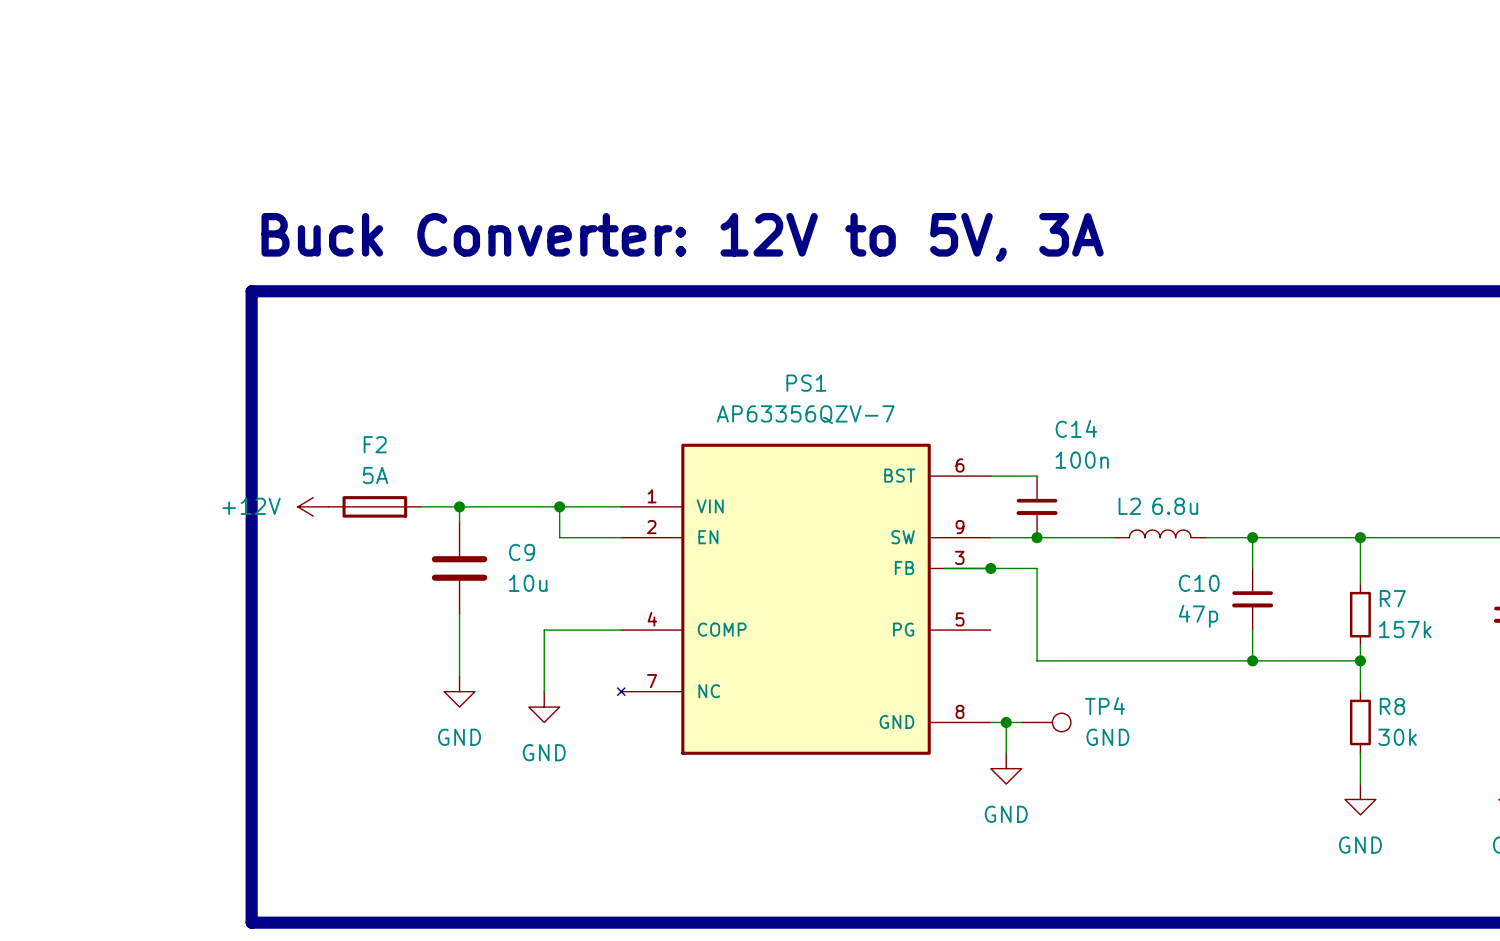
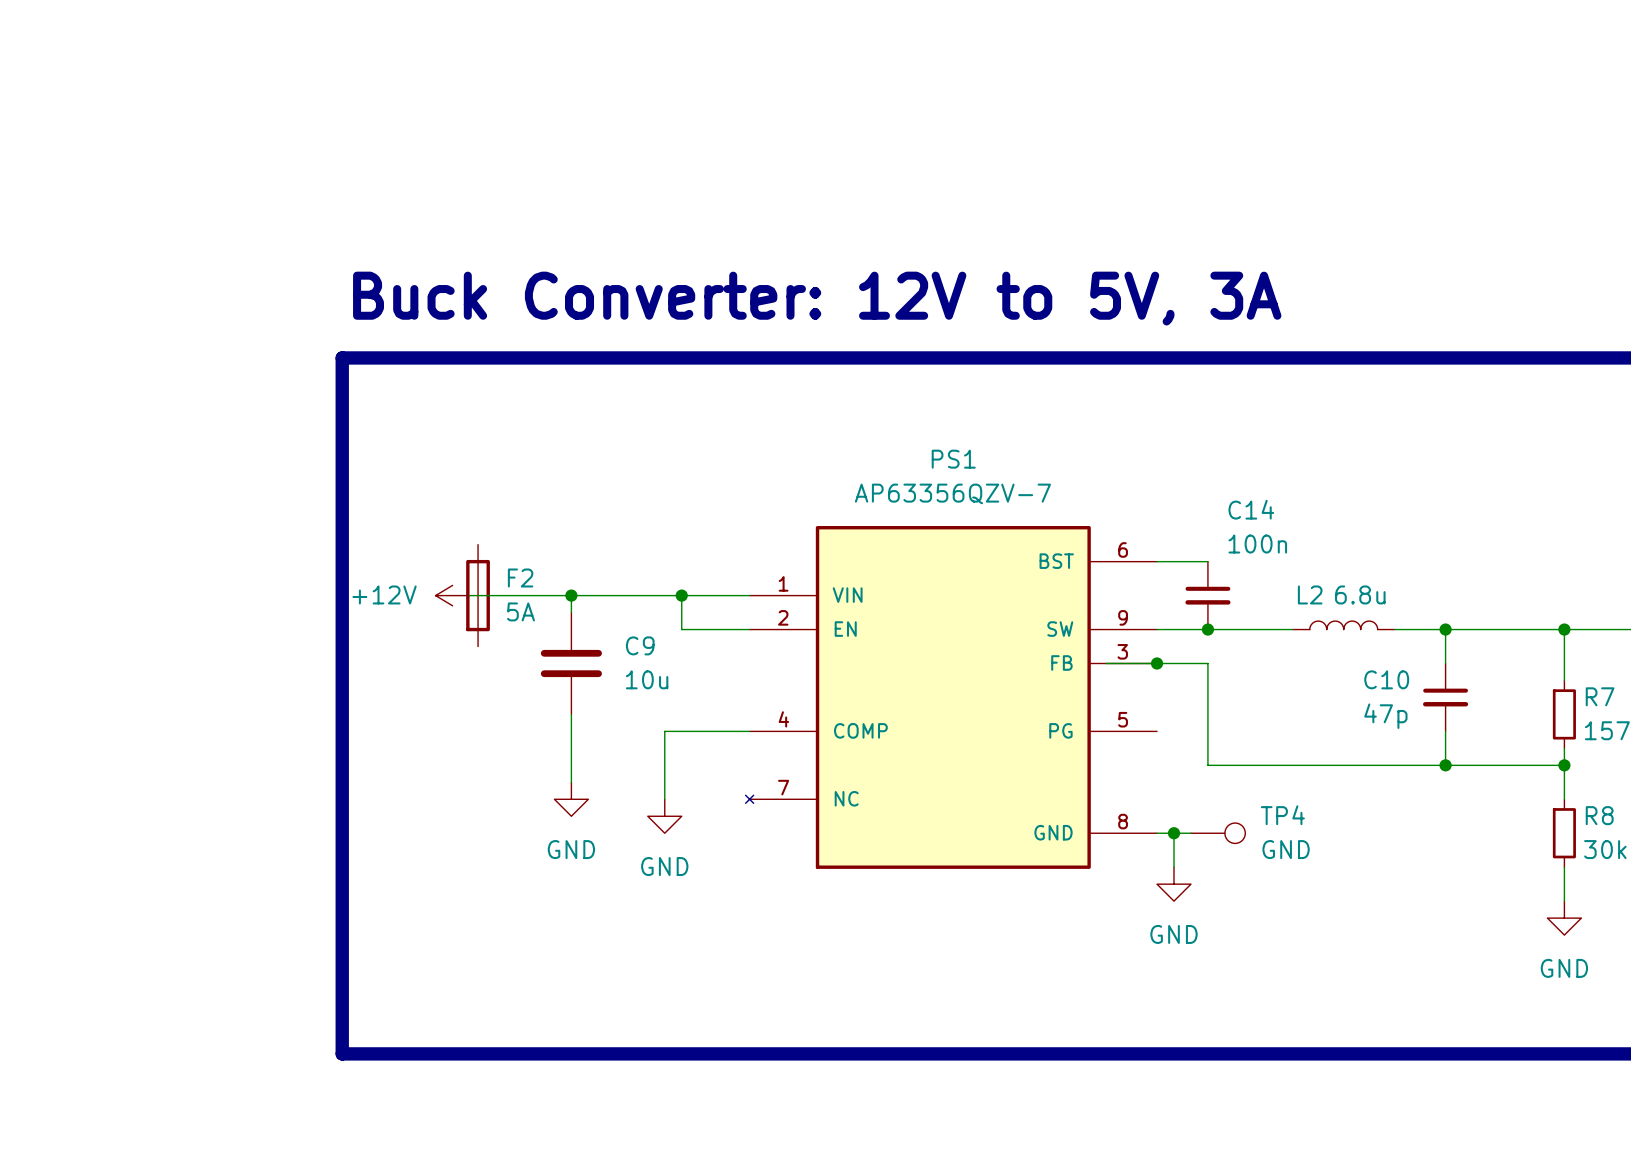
F2 name position: F2 (375, 444) -> F2 (520, 577)
power symbol position: +12V (313, 506) -> +12V (452, 595)
F2 rotation: 0° (374, 506) -> 90° clockwise (478, 595)

